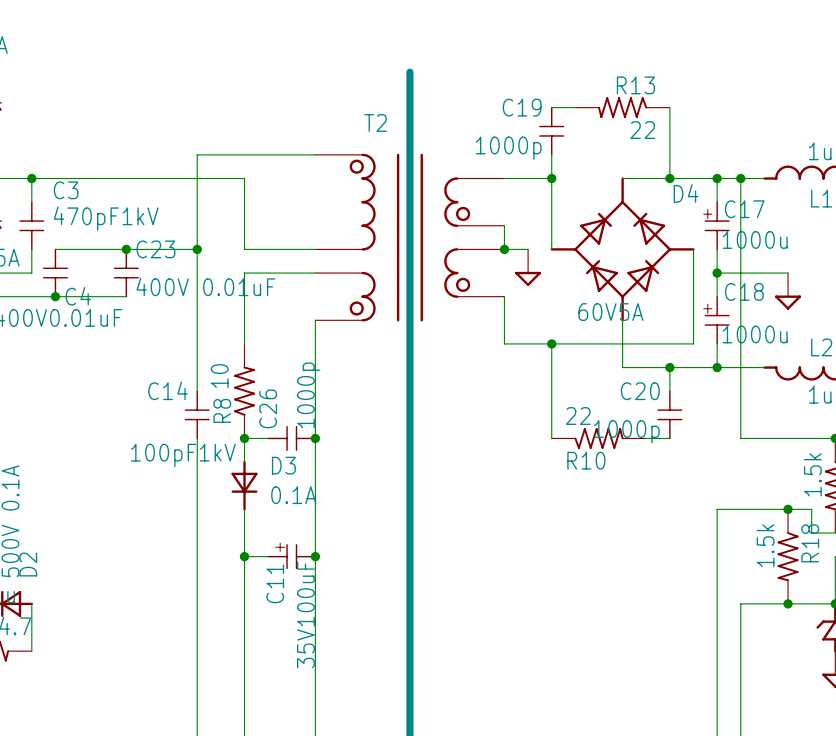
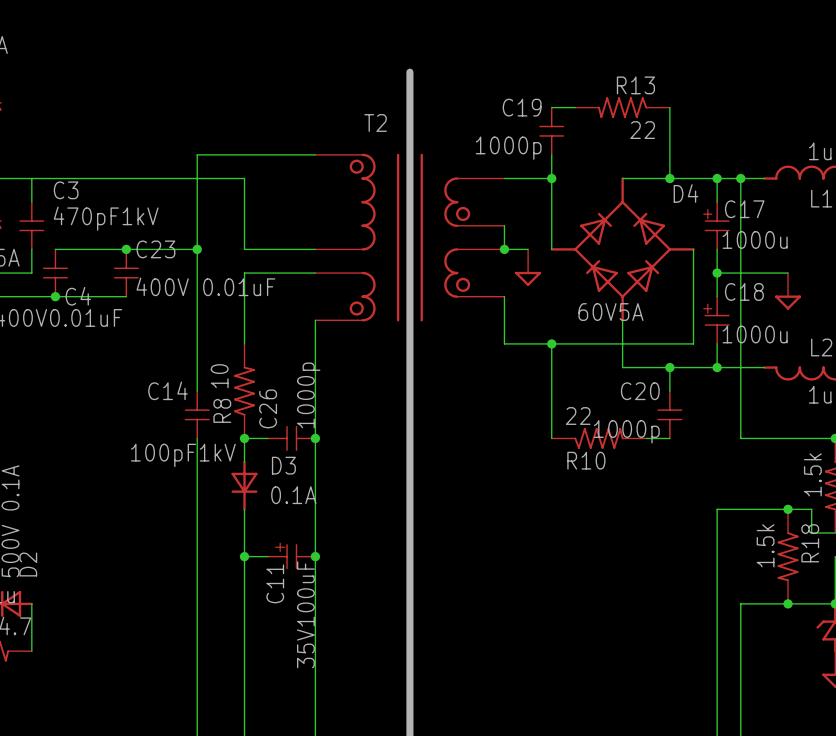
junction: (31, 178) -> none

